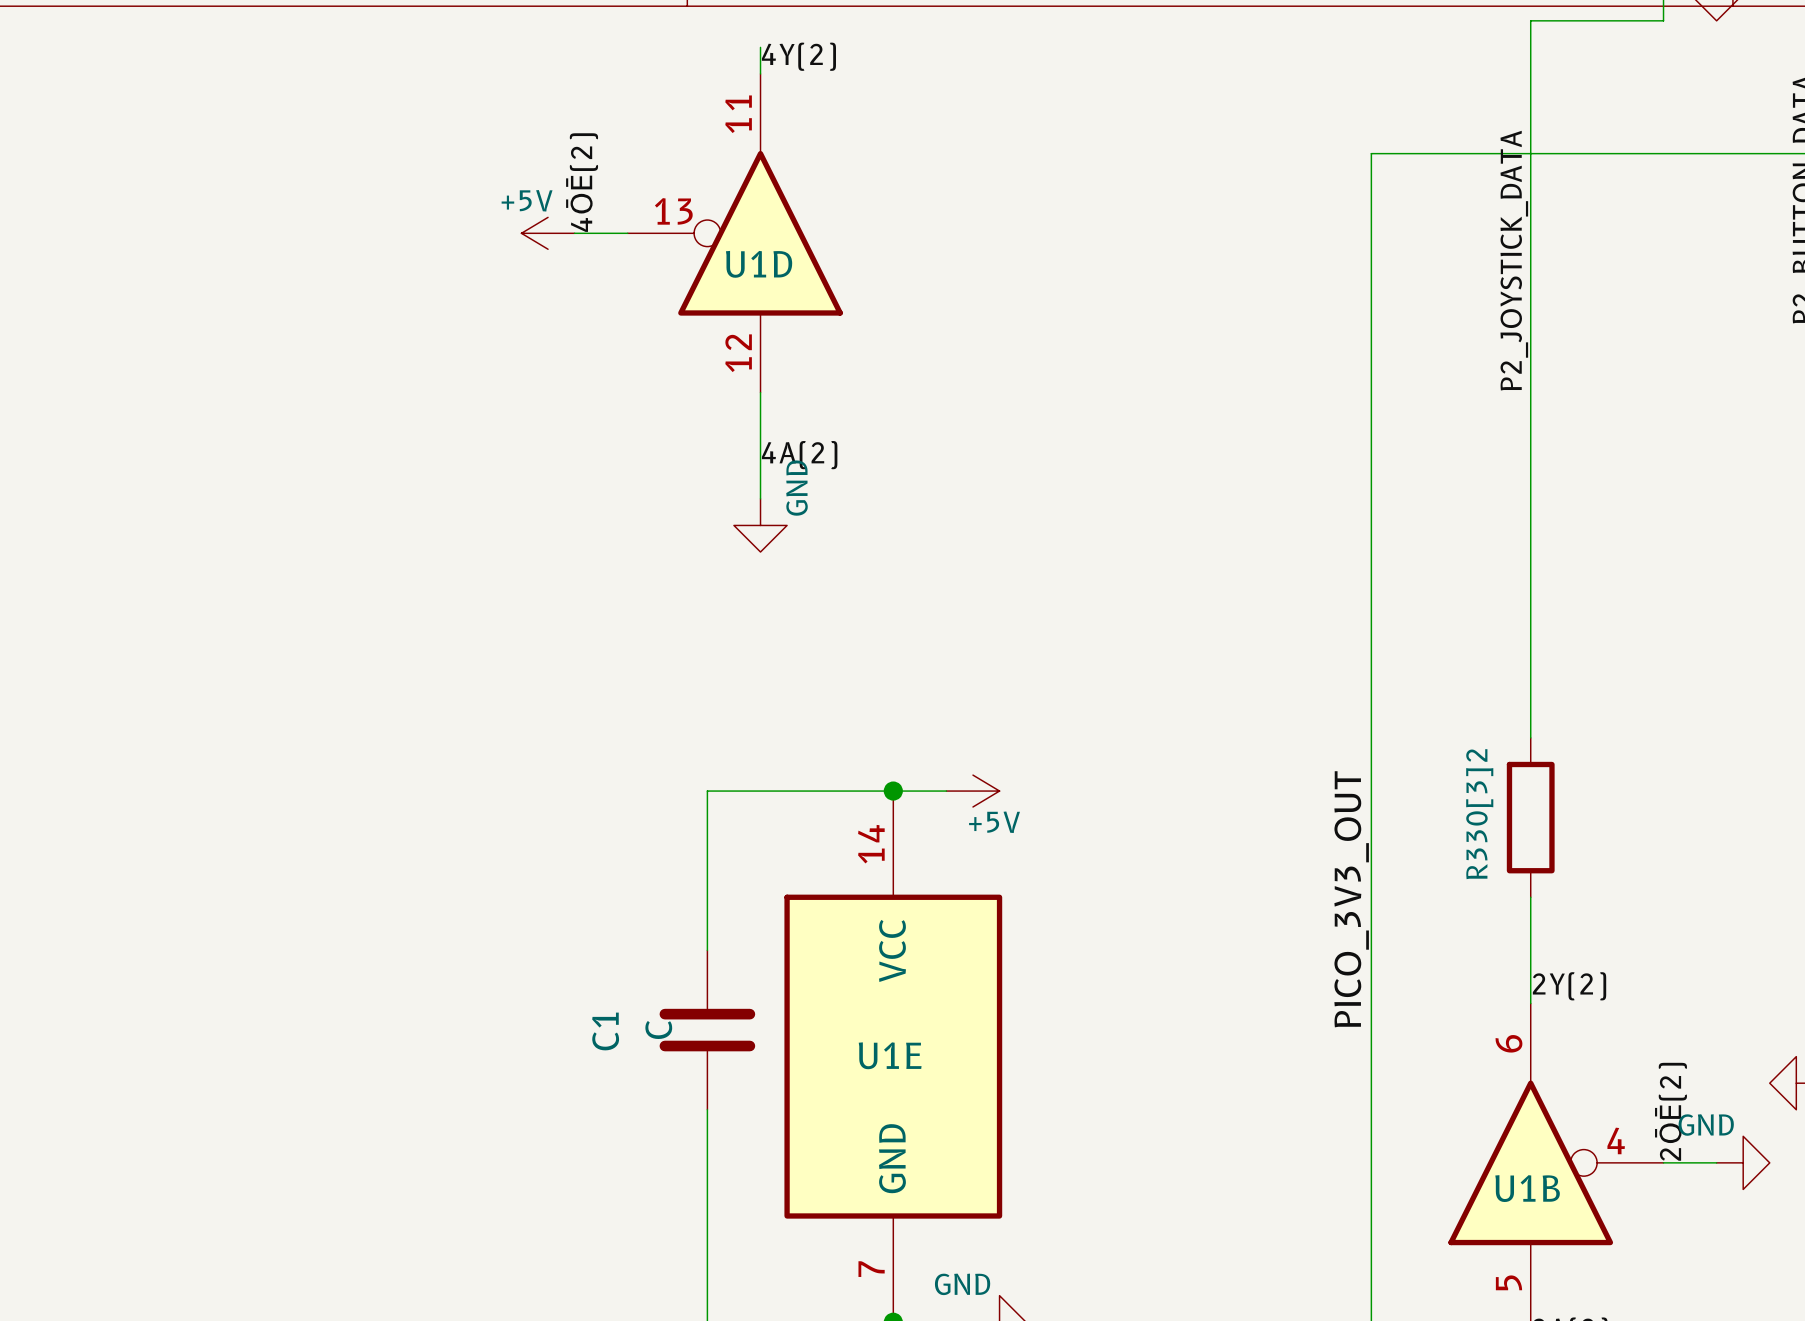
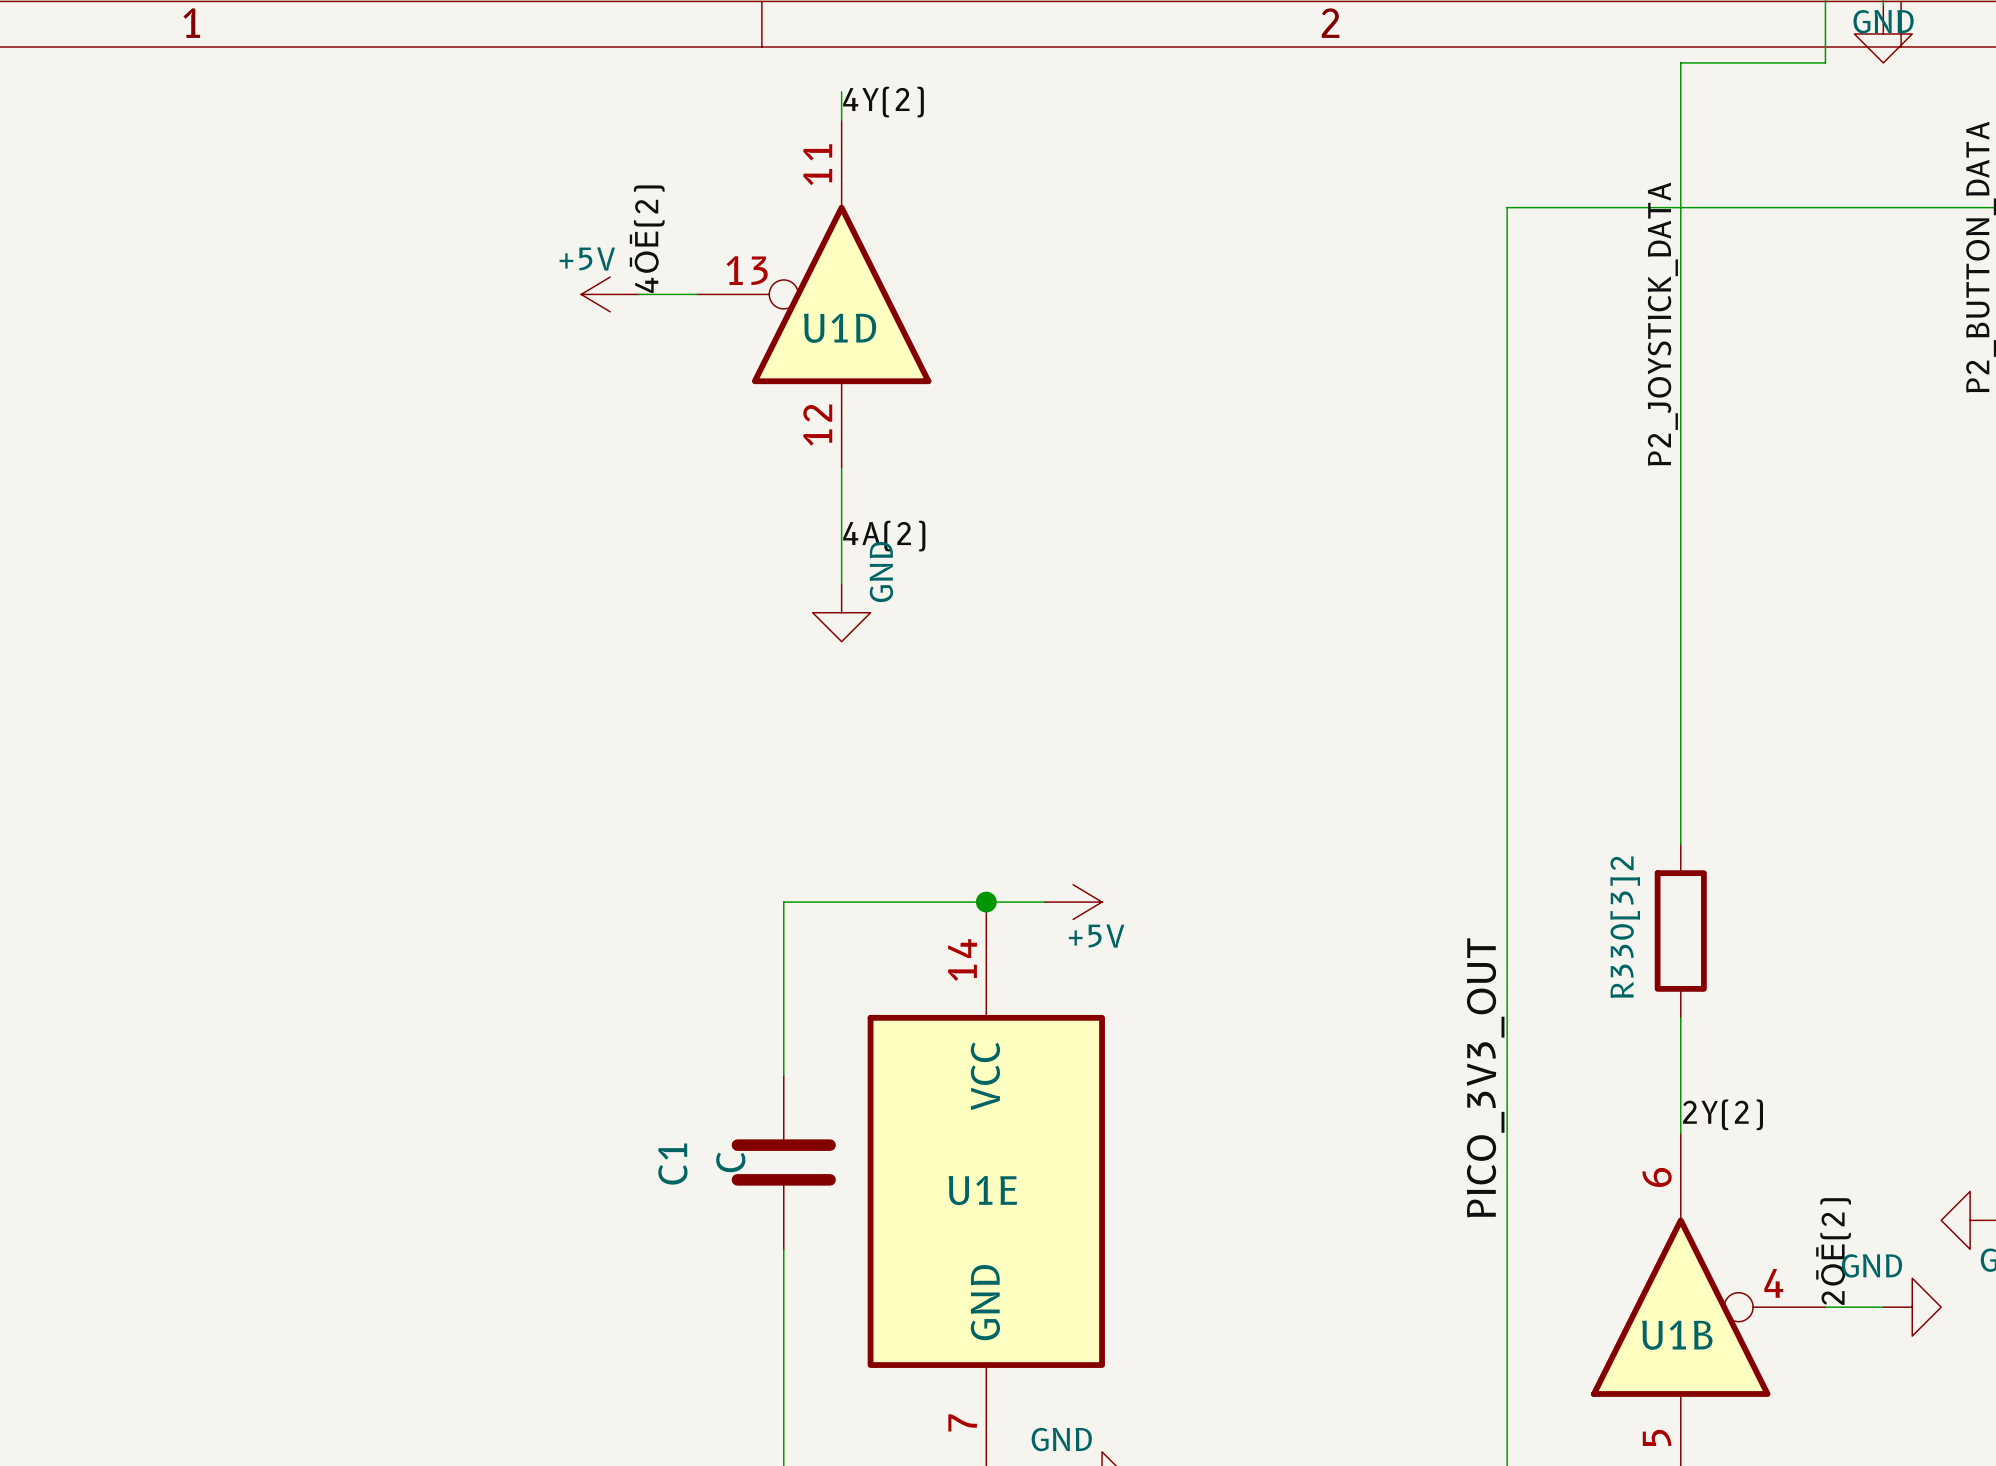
label position: PICO_3V3_OUT (1351, 899) -> PICO_3V3_OUT (1485, 1077)

